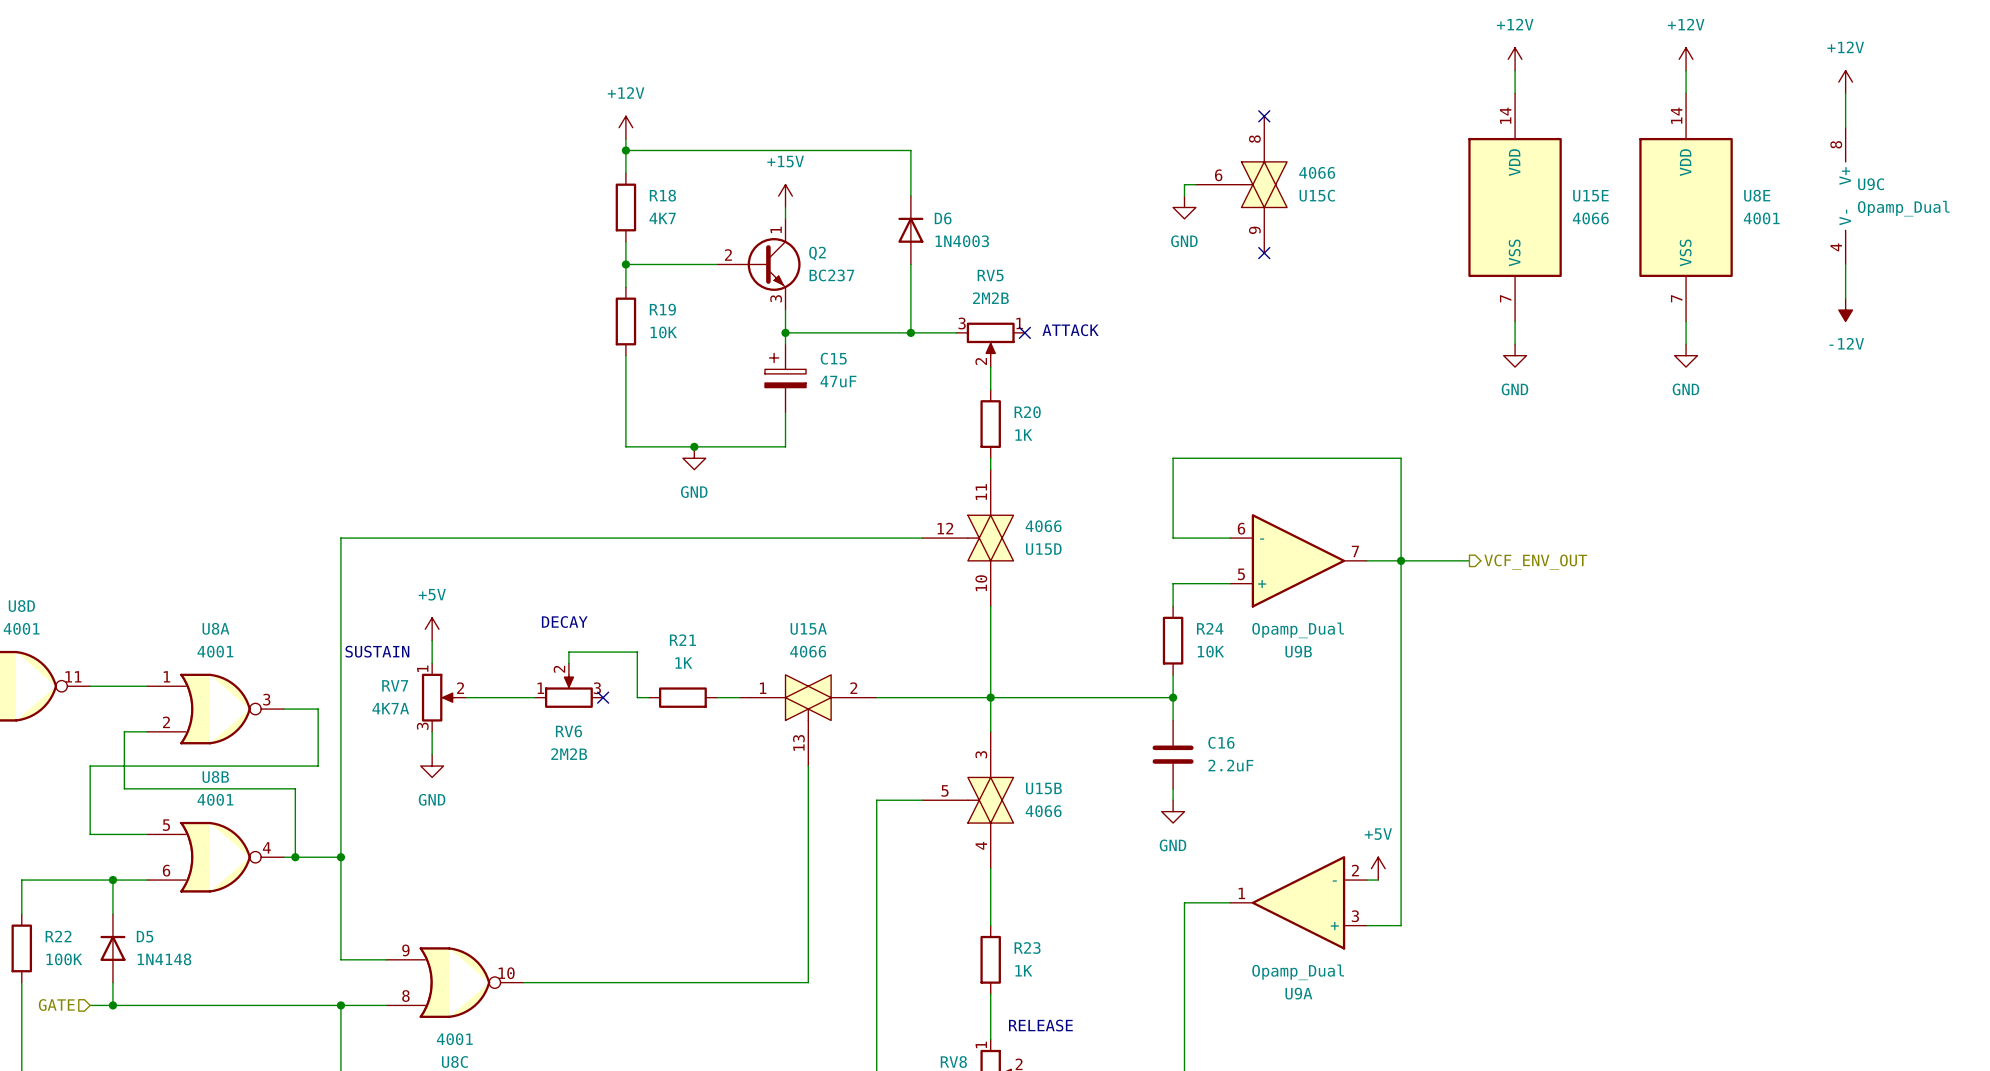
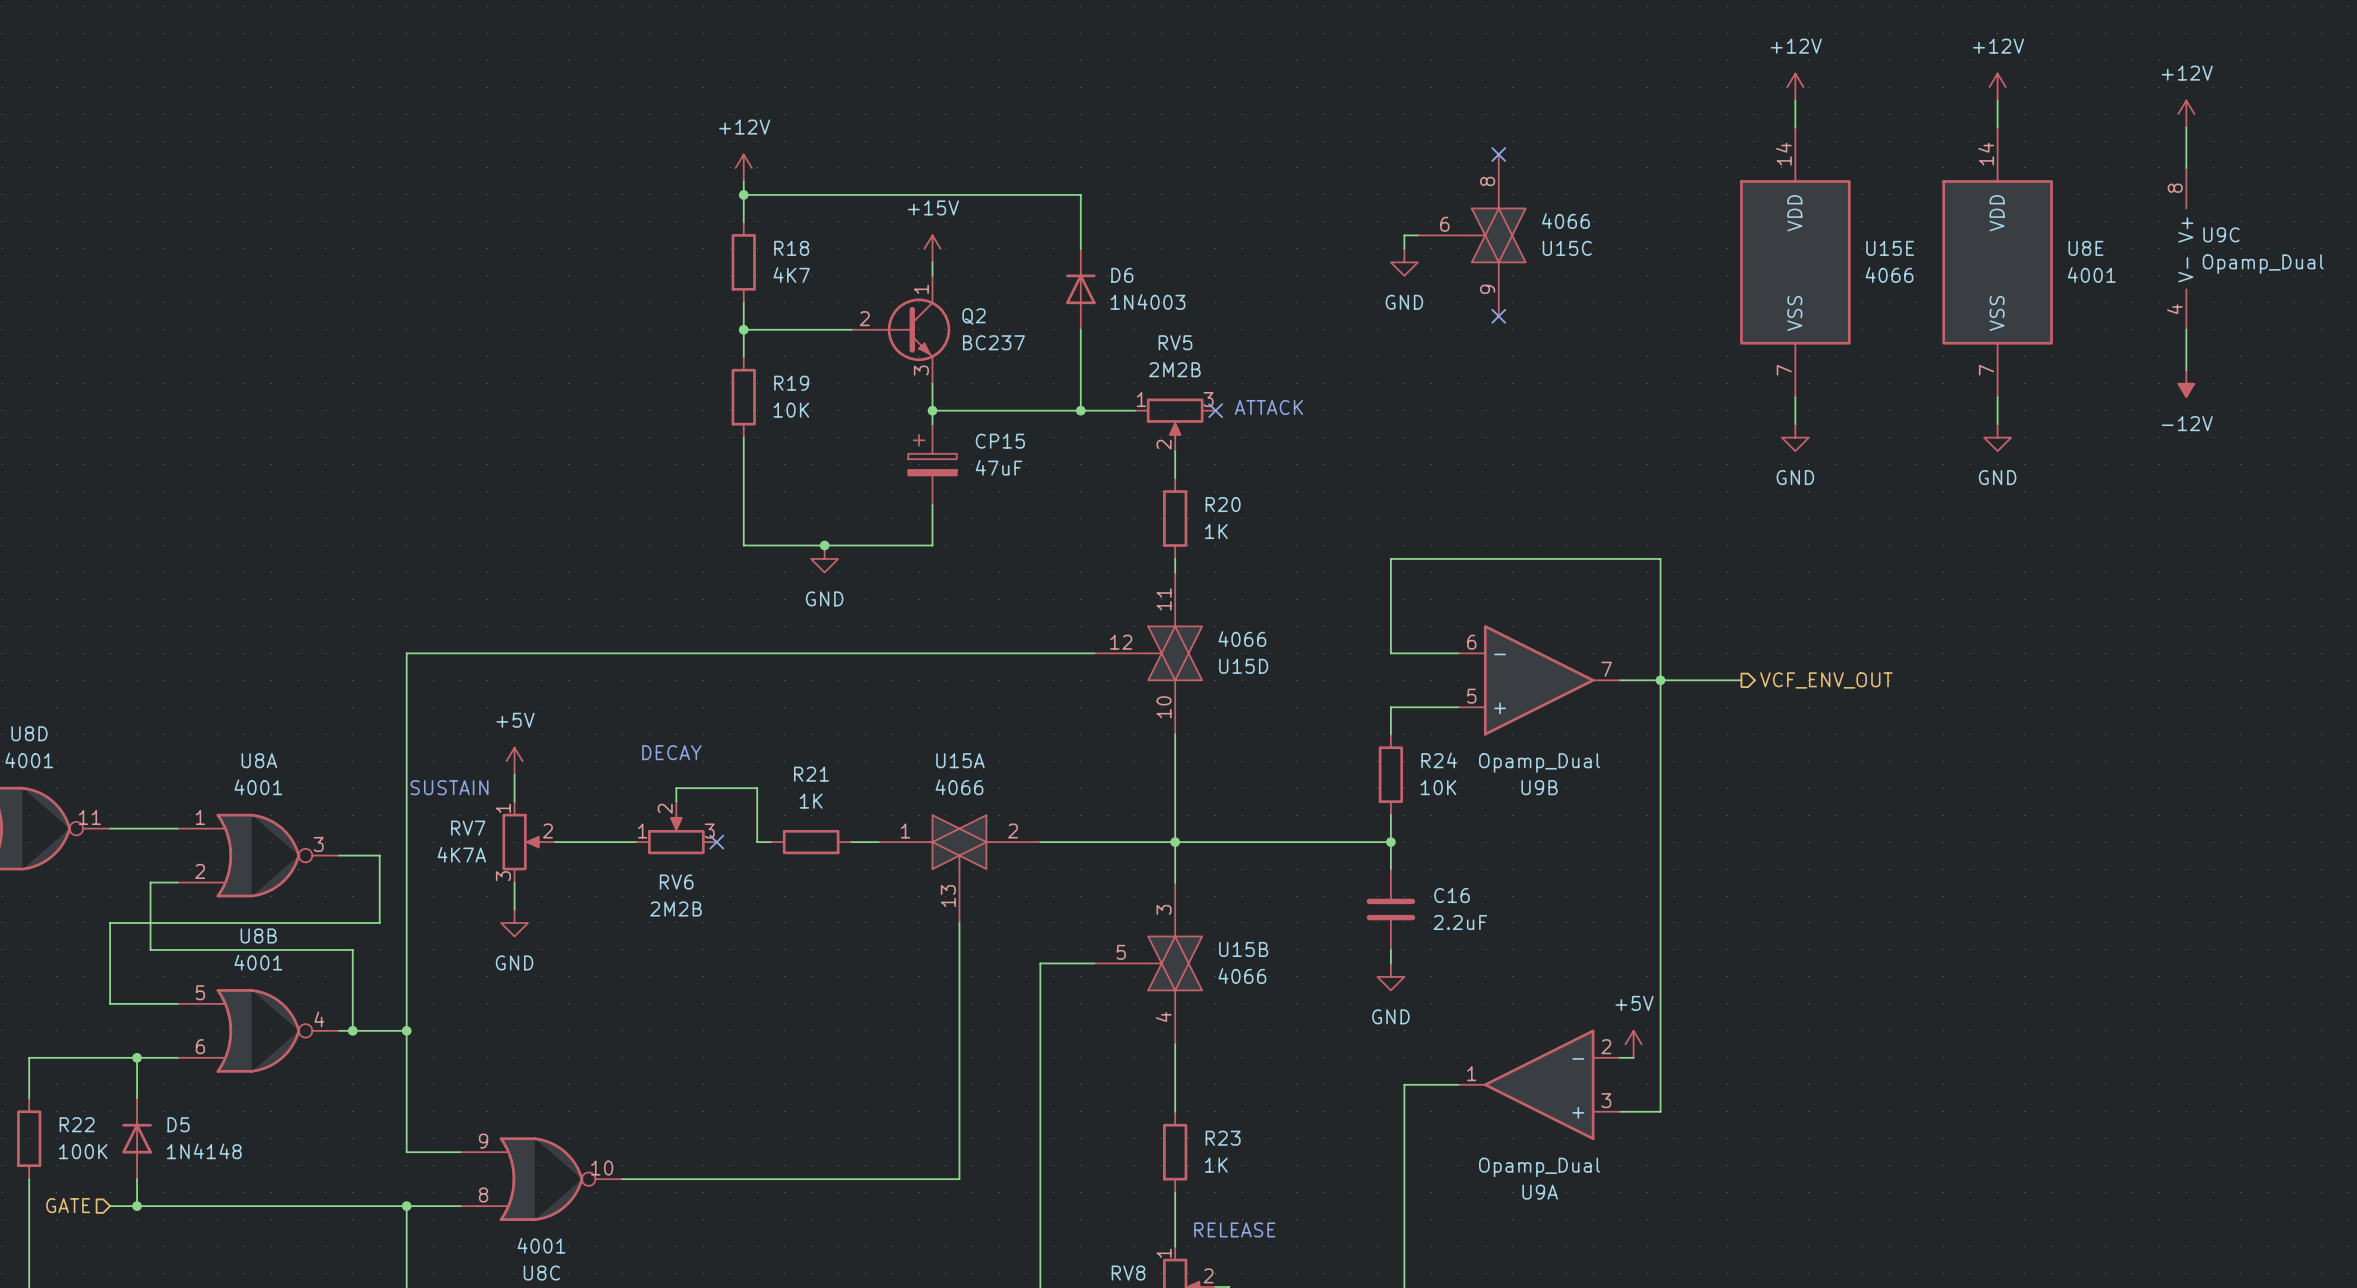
RV5 flip: as is (990, 339) -> left-right (1175, 418)
C15 name: C15 (833, 358) -> CP15 (1000, 441)

